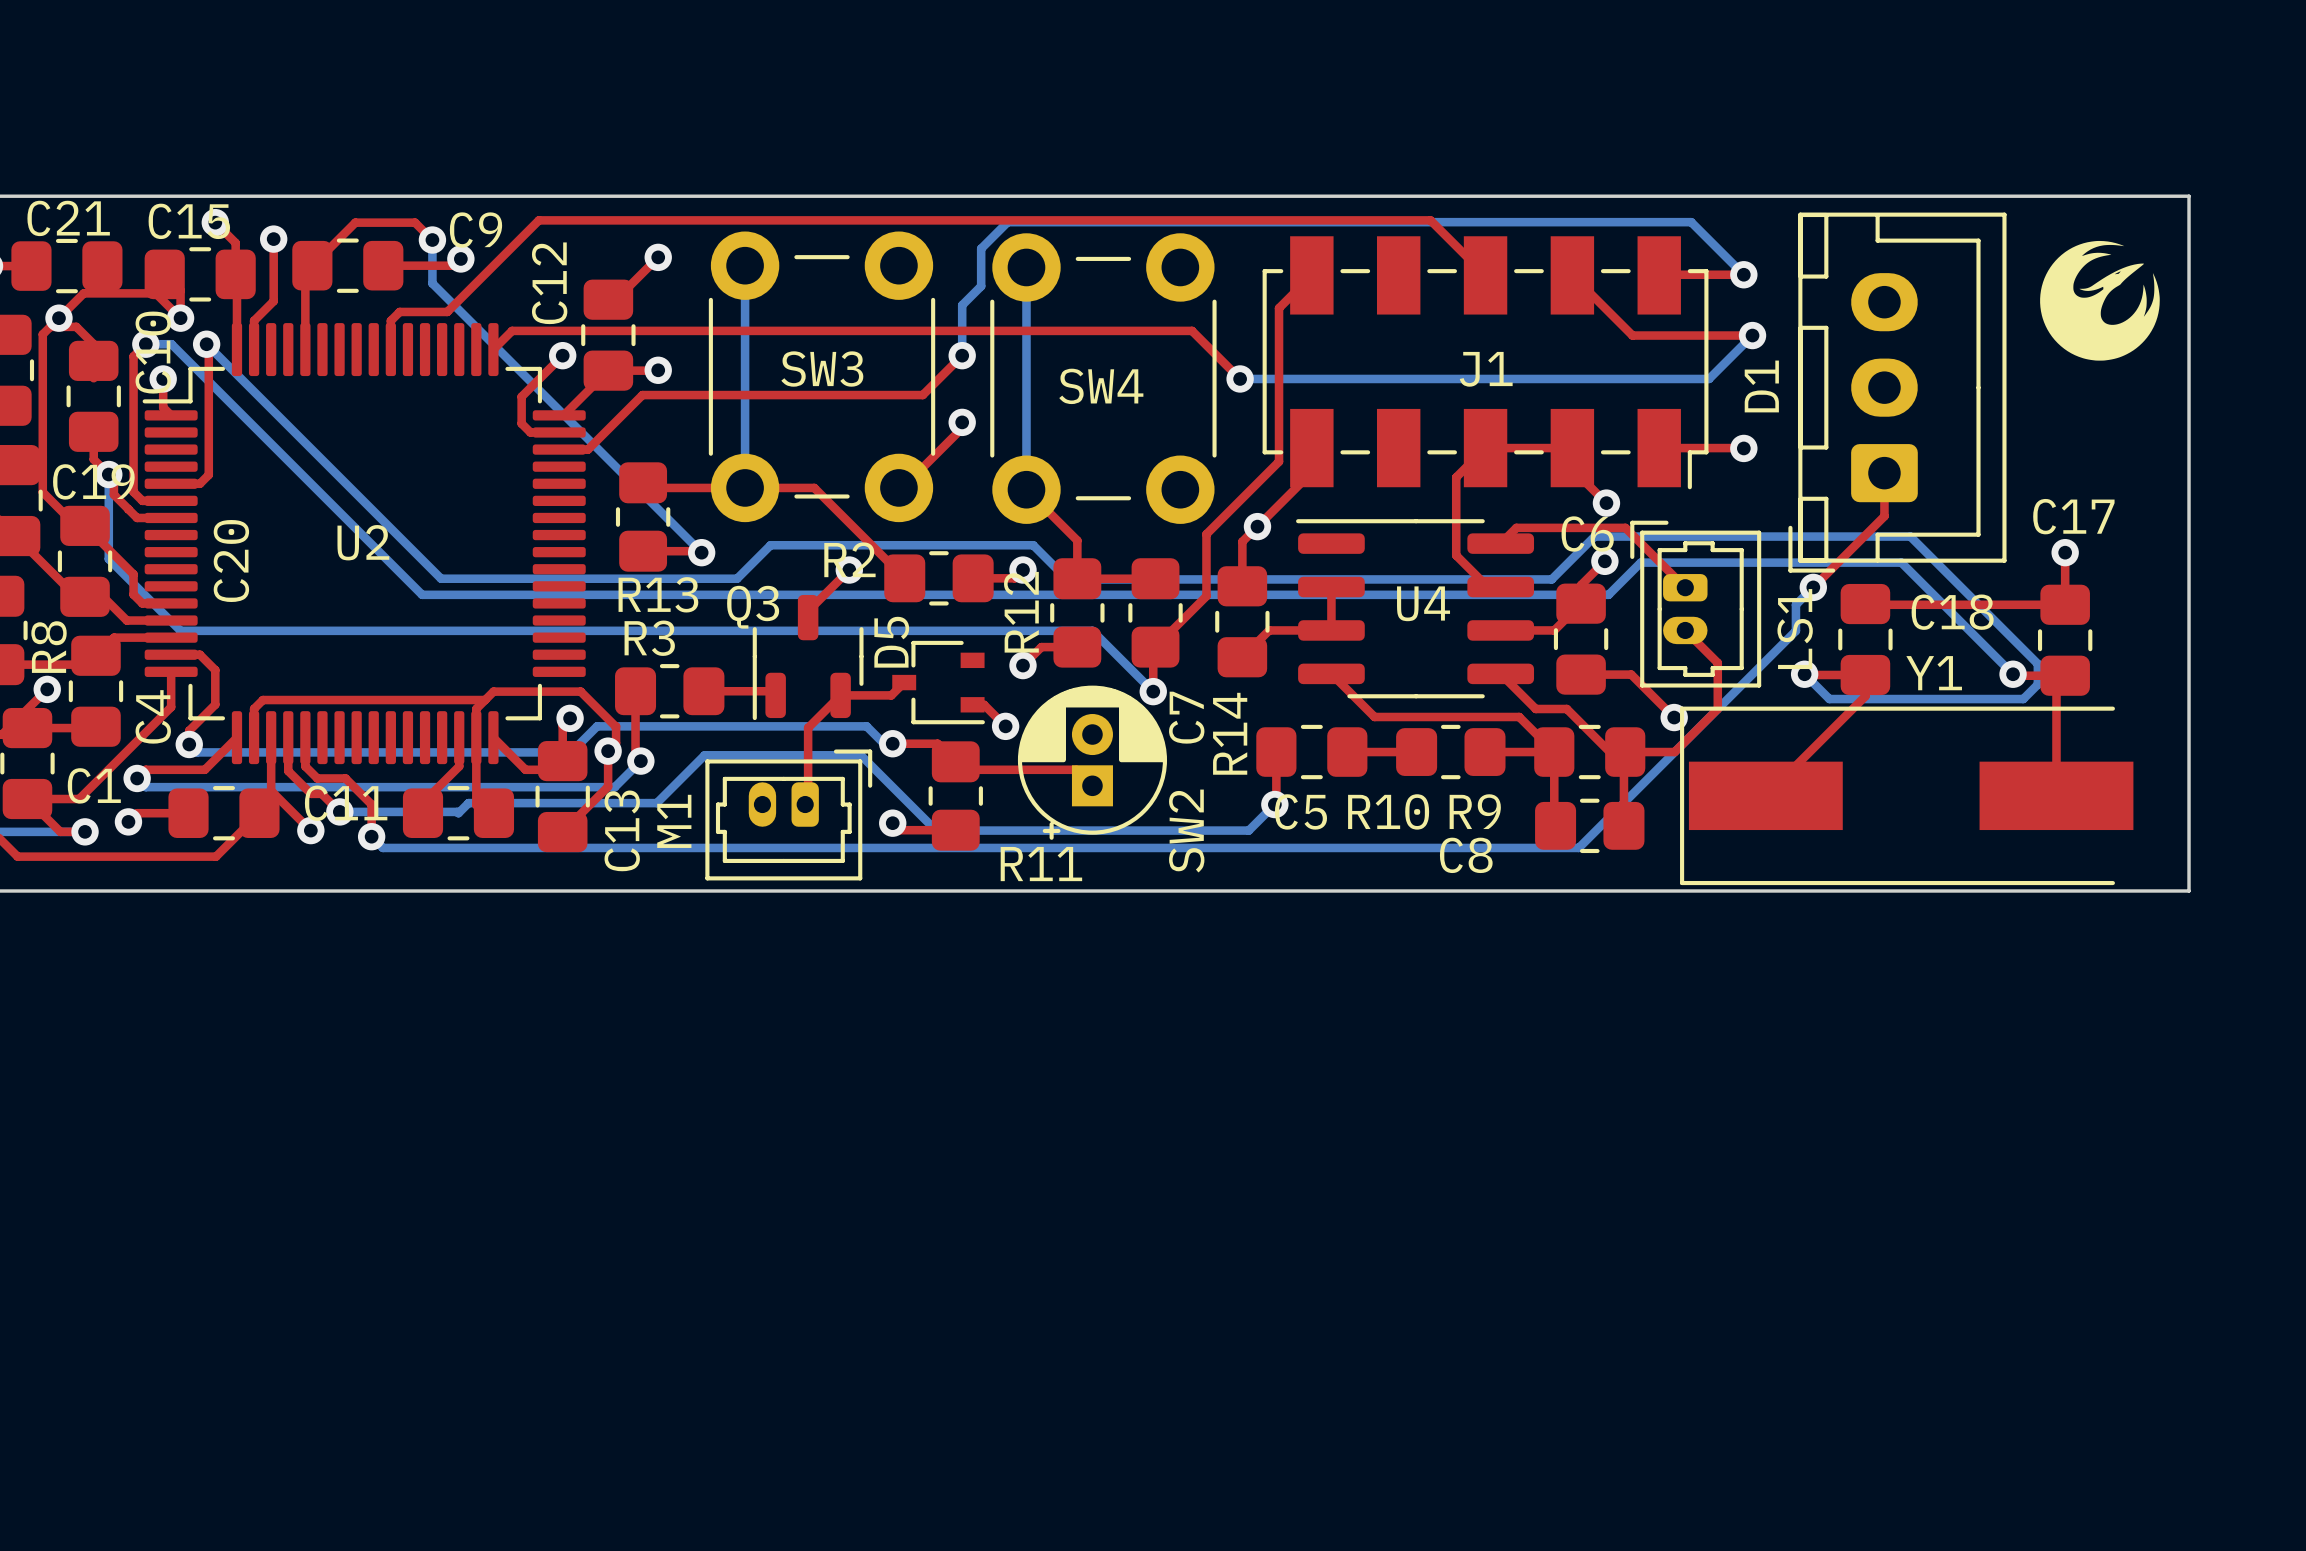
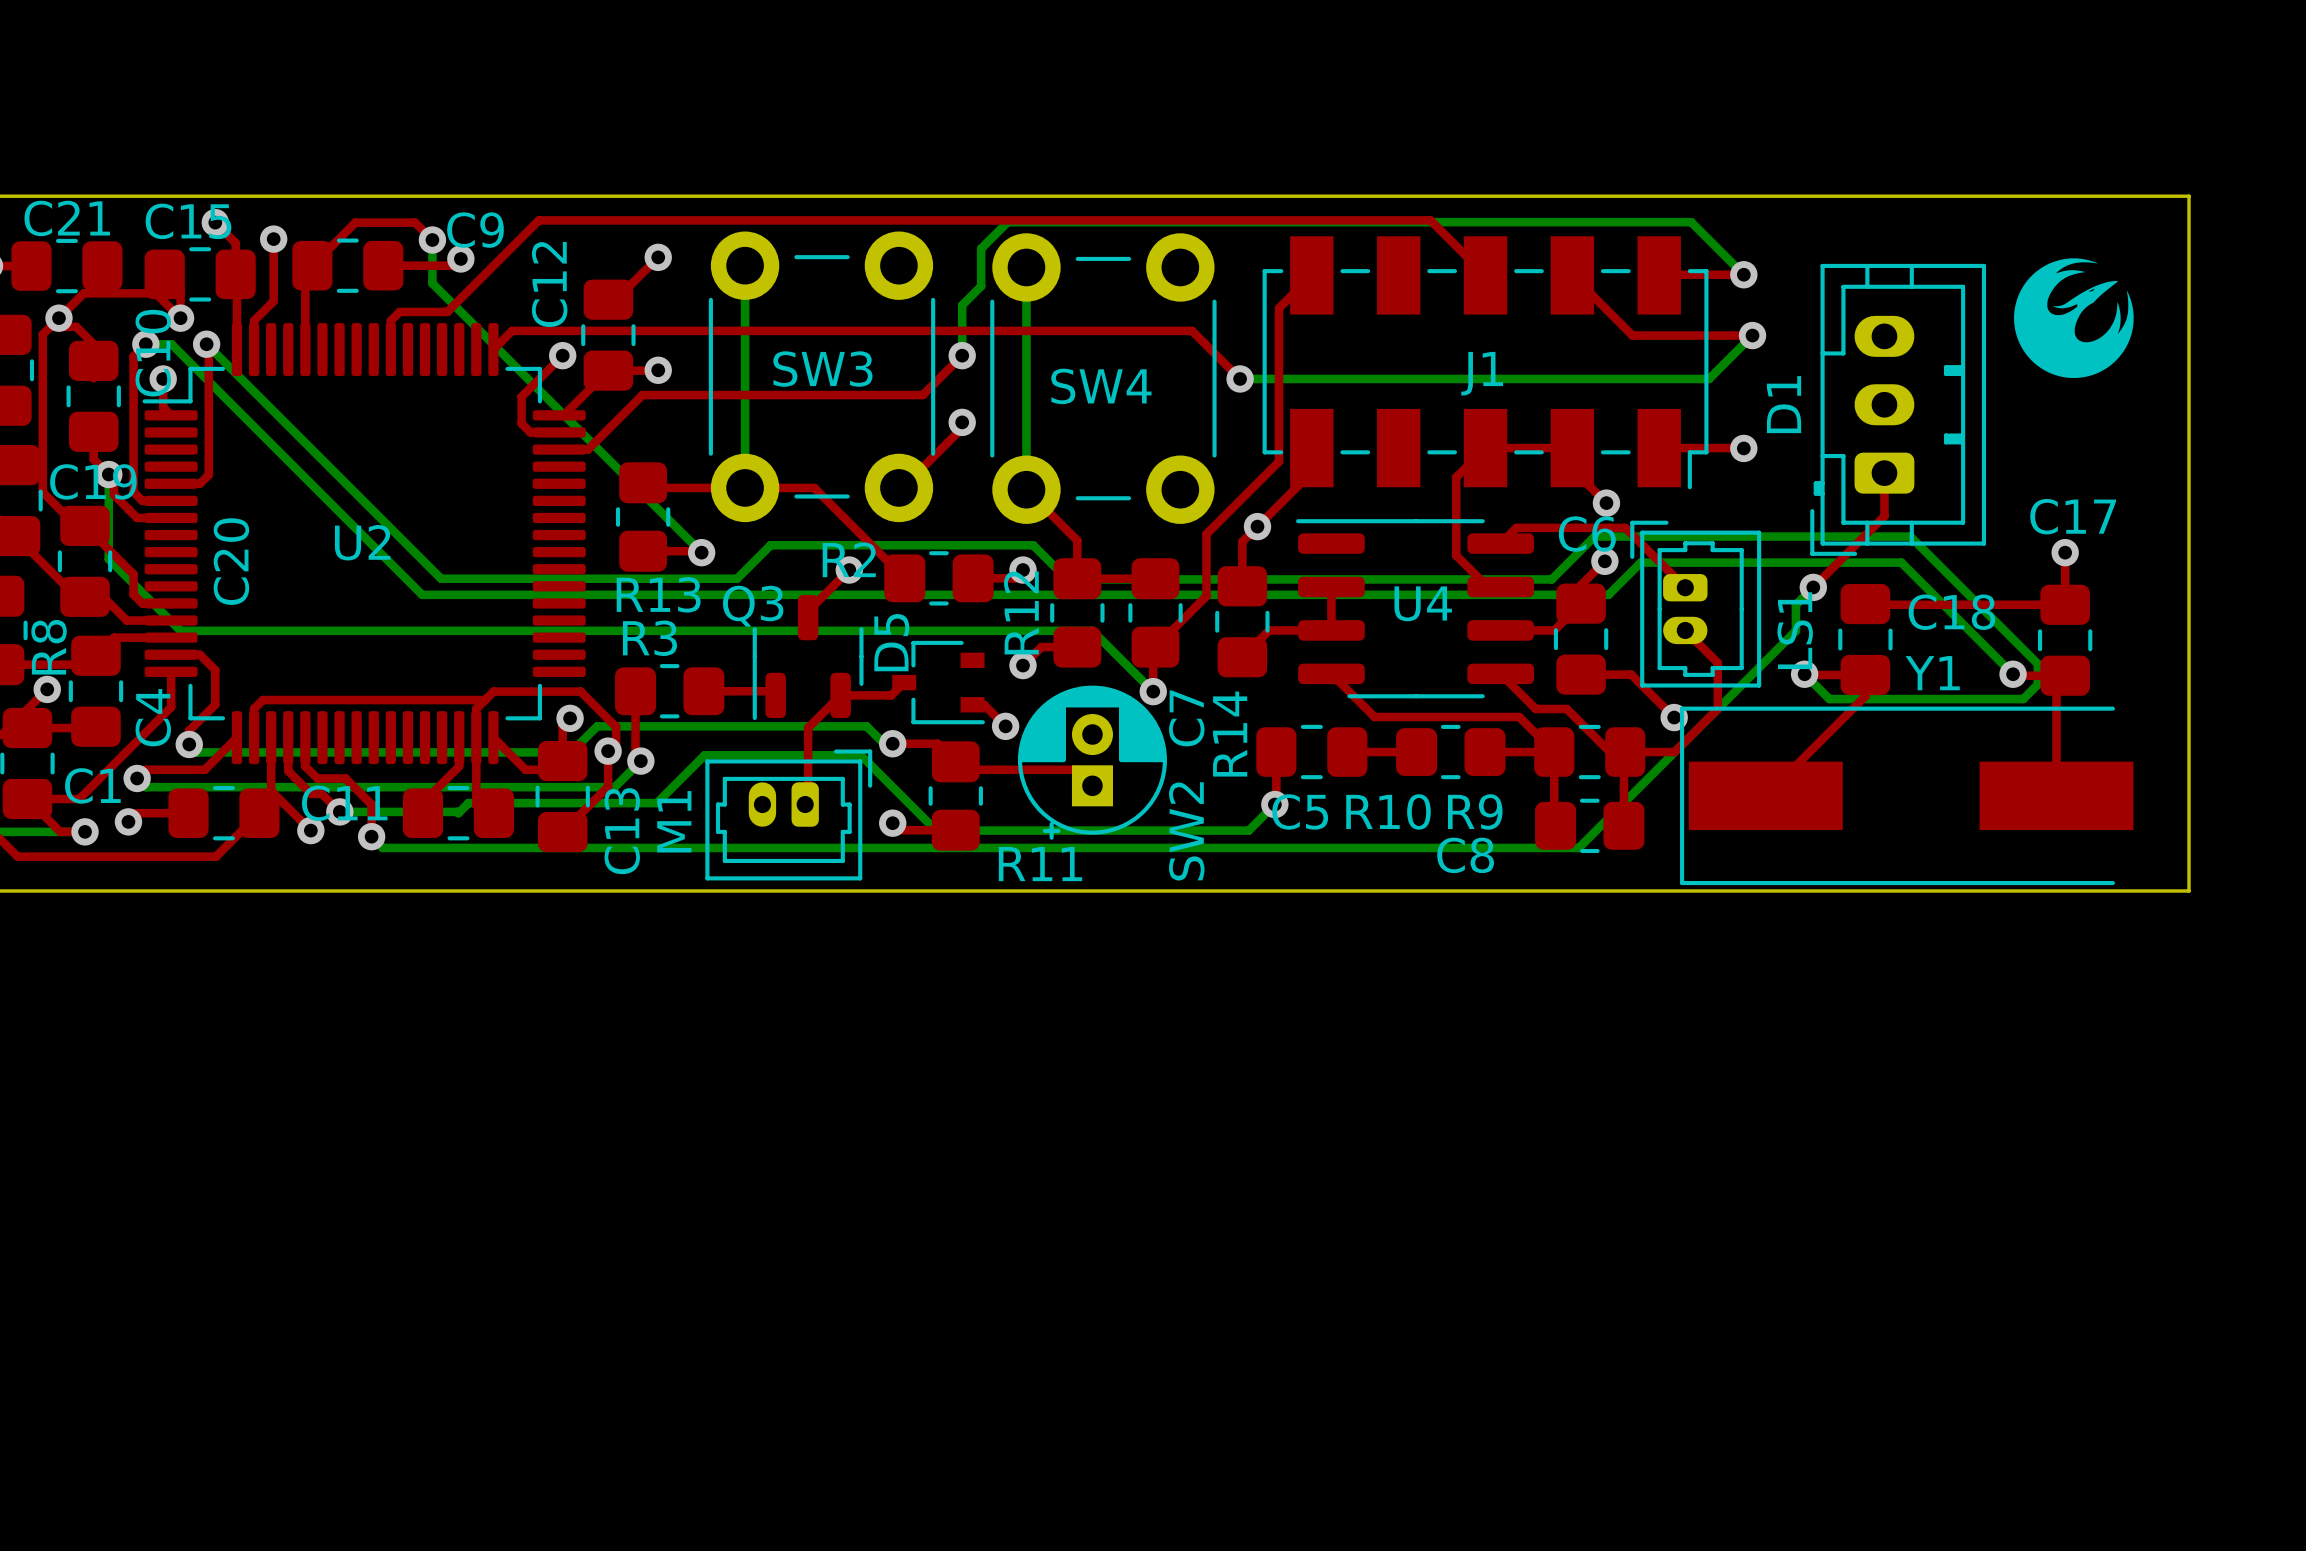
D1 footprint: [1788, 212, 2007, 573] -> [1810, 263, 1987, 556]
drawing position: (2099, 300) -> (2073, 318)

